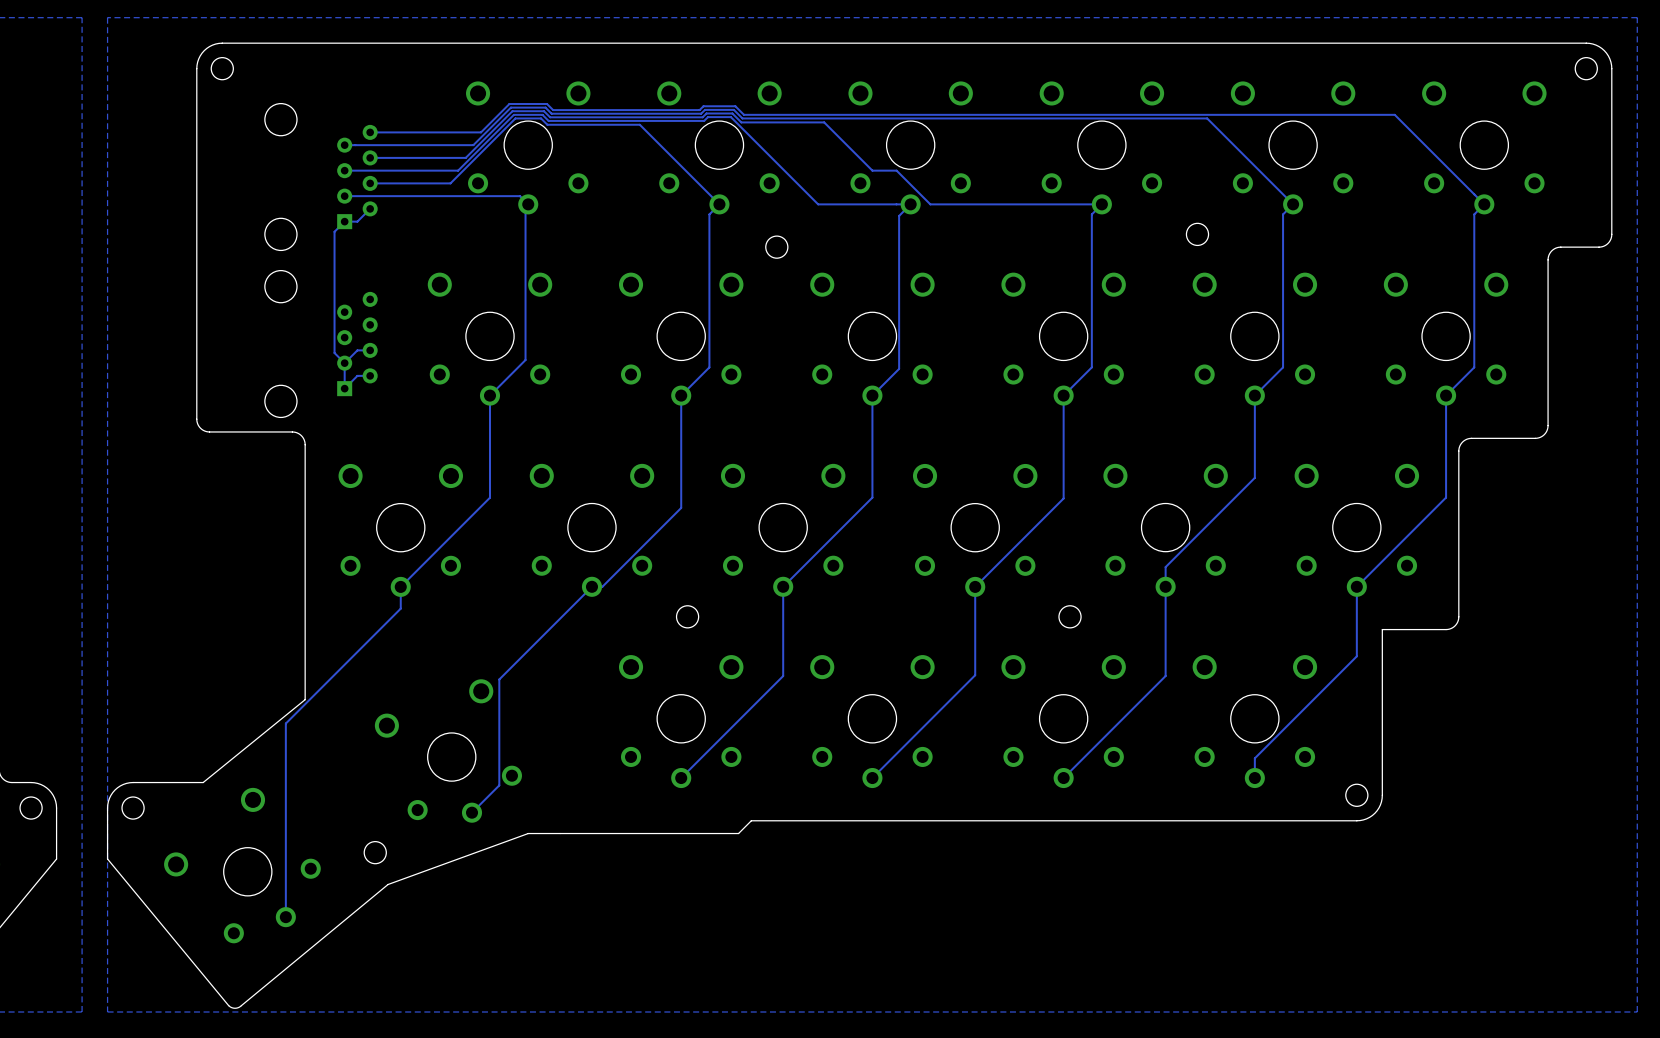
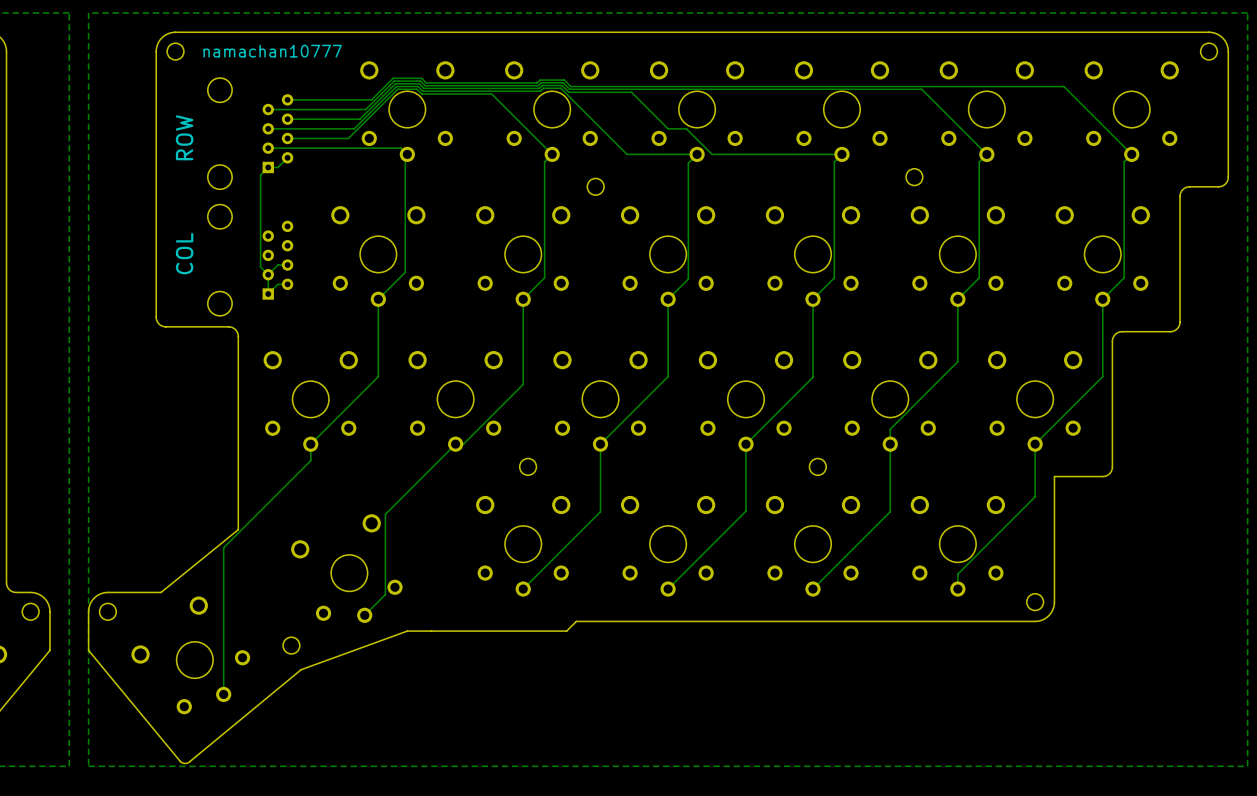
text: none -> namachan10777 (272, 51)
text: none -> ROW (184, 137)
text: none -> COL (184, 253)

